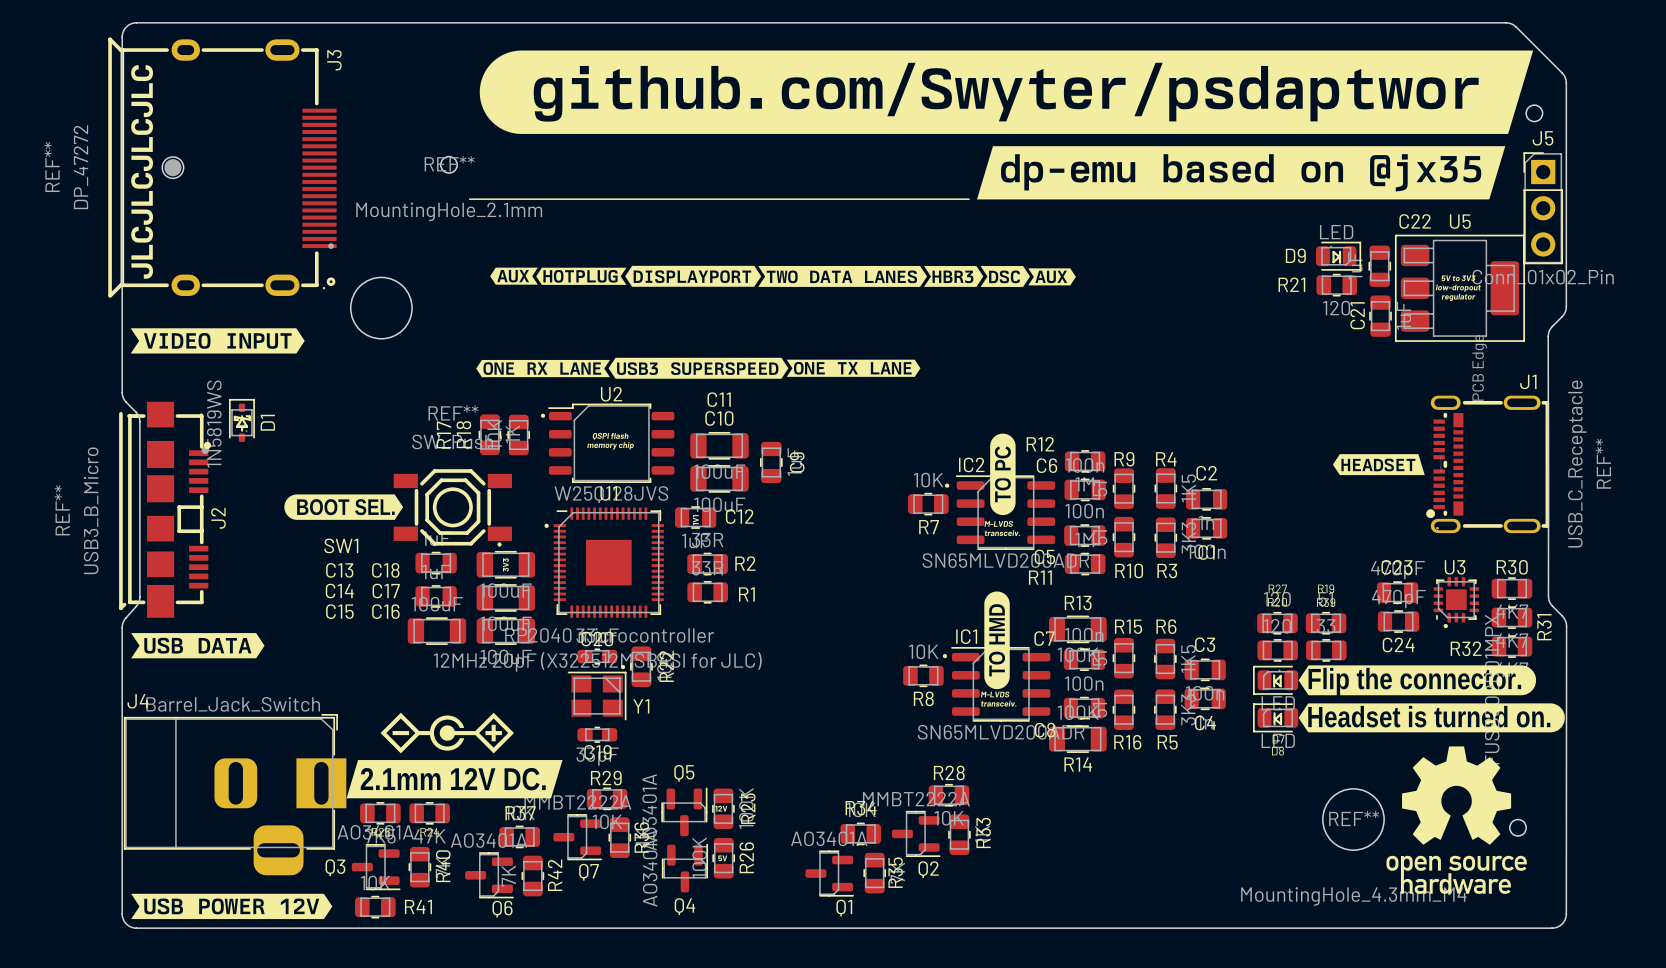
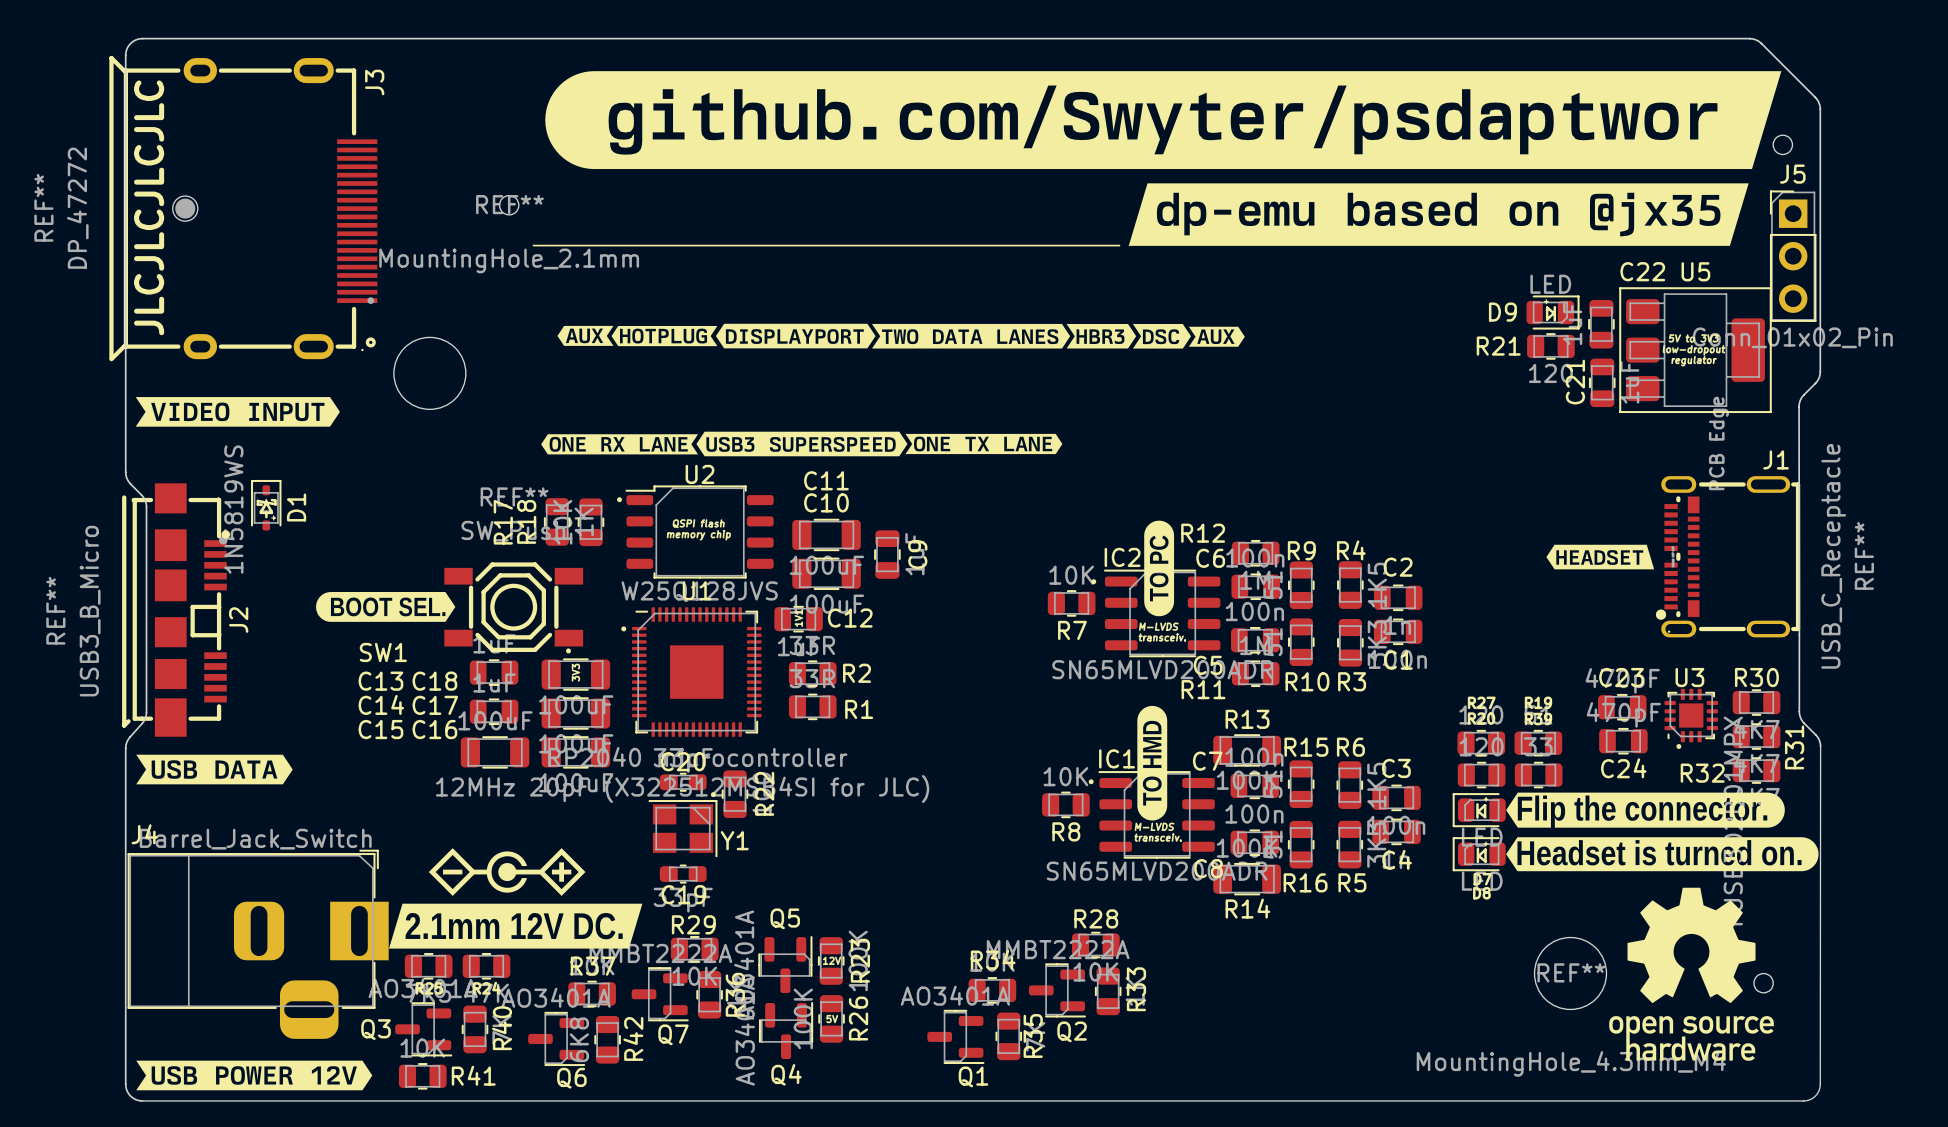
R42 value: 7K (508, 875) -> 6K8 (579, 1039)

